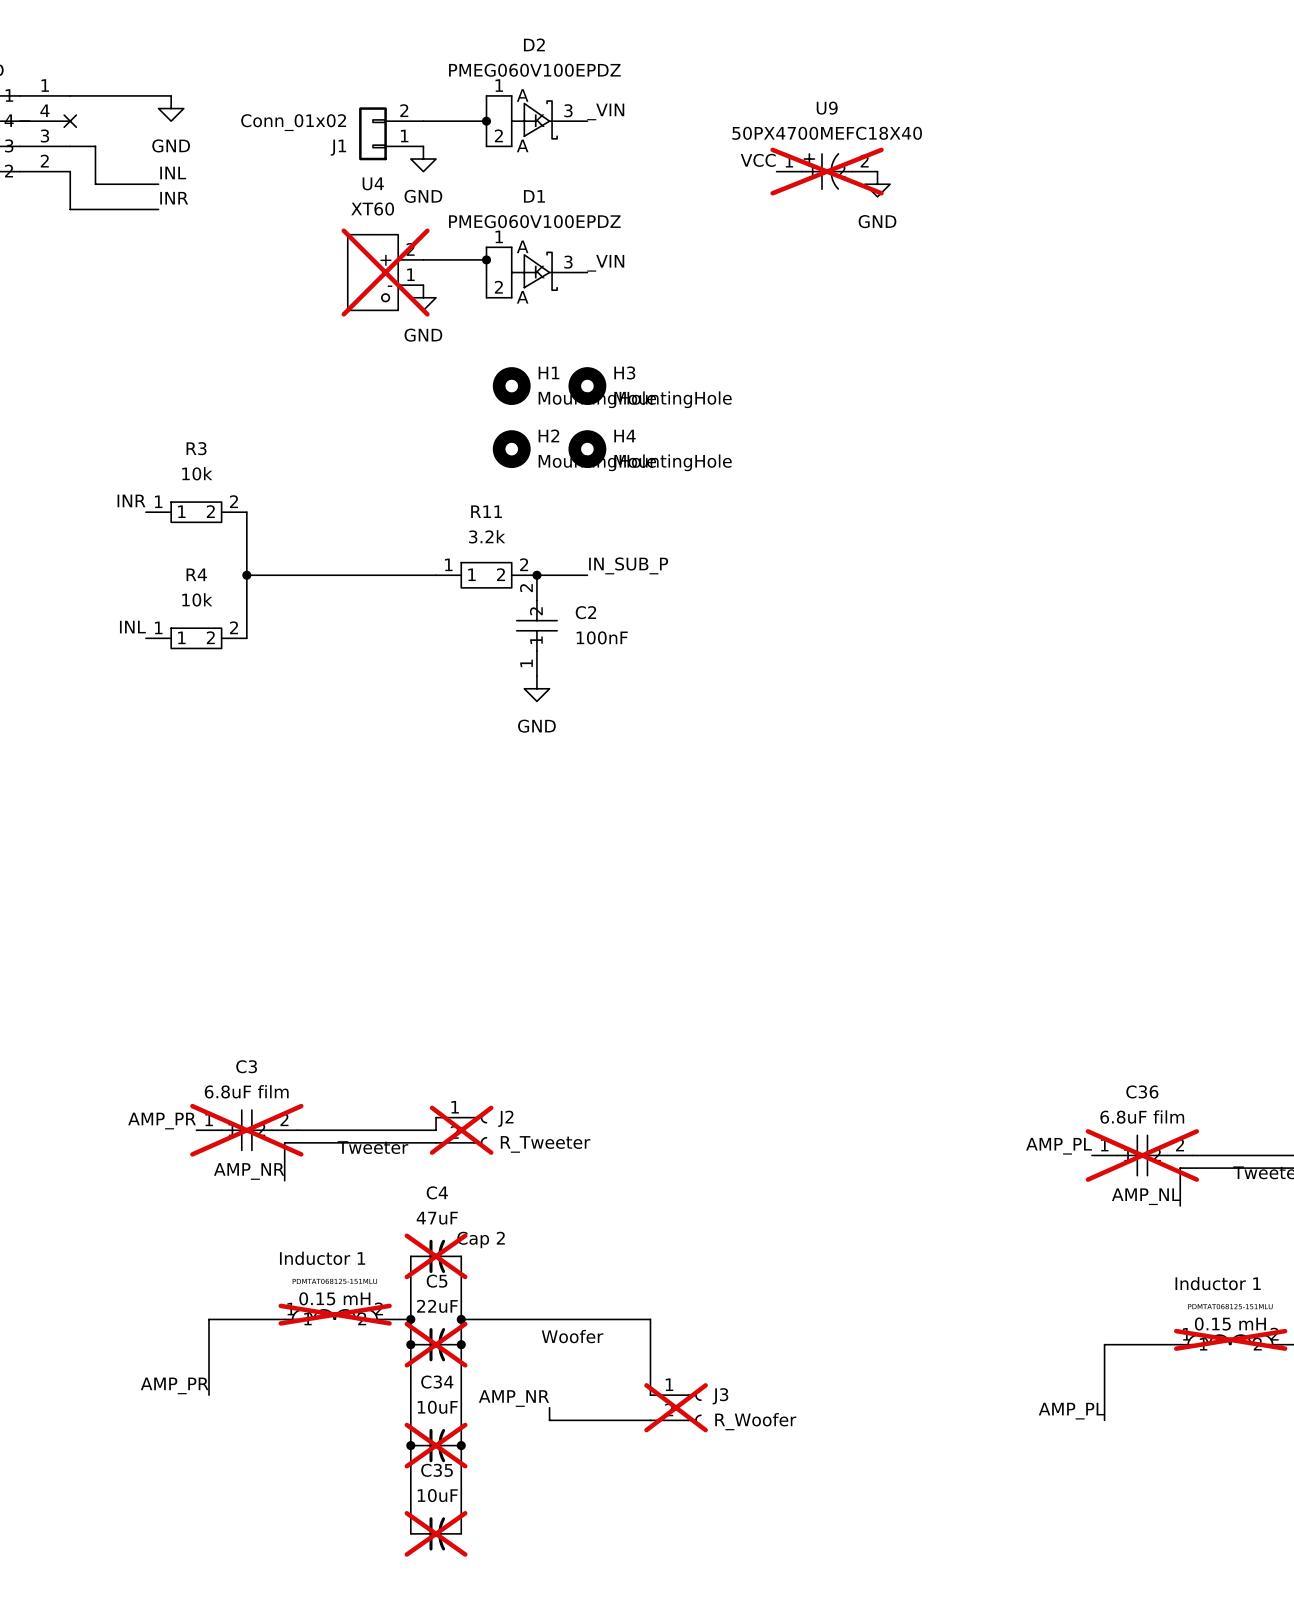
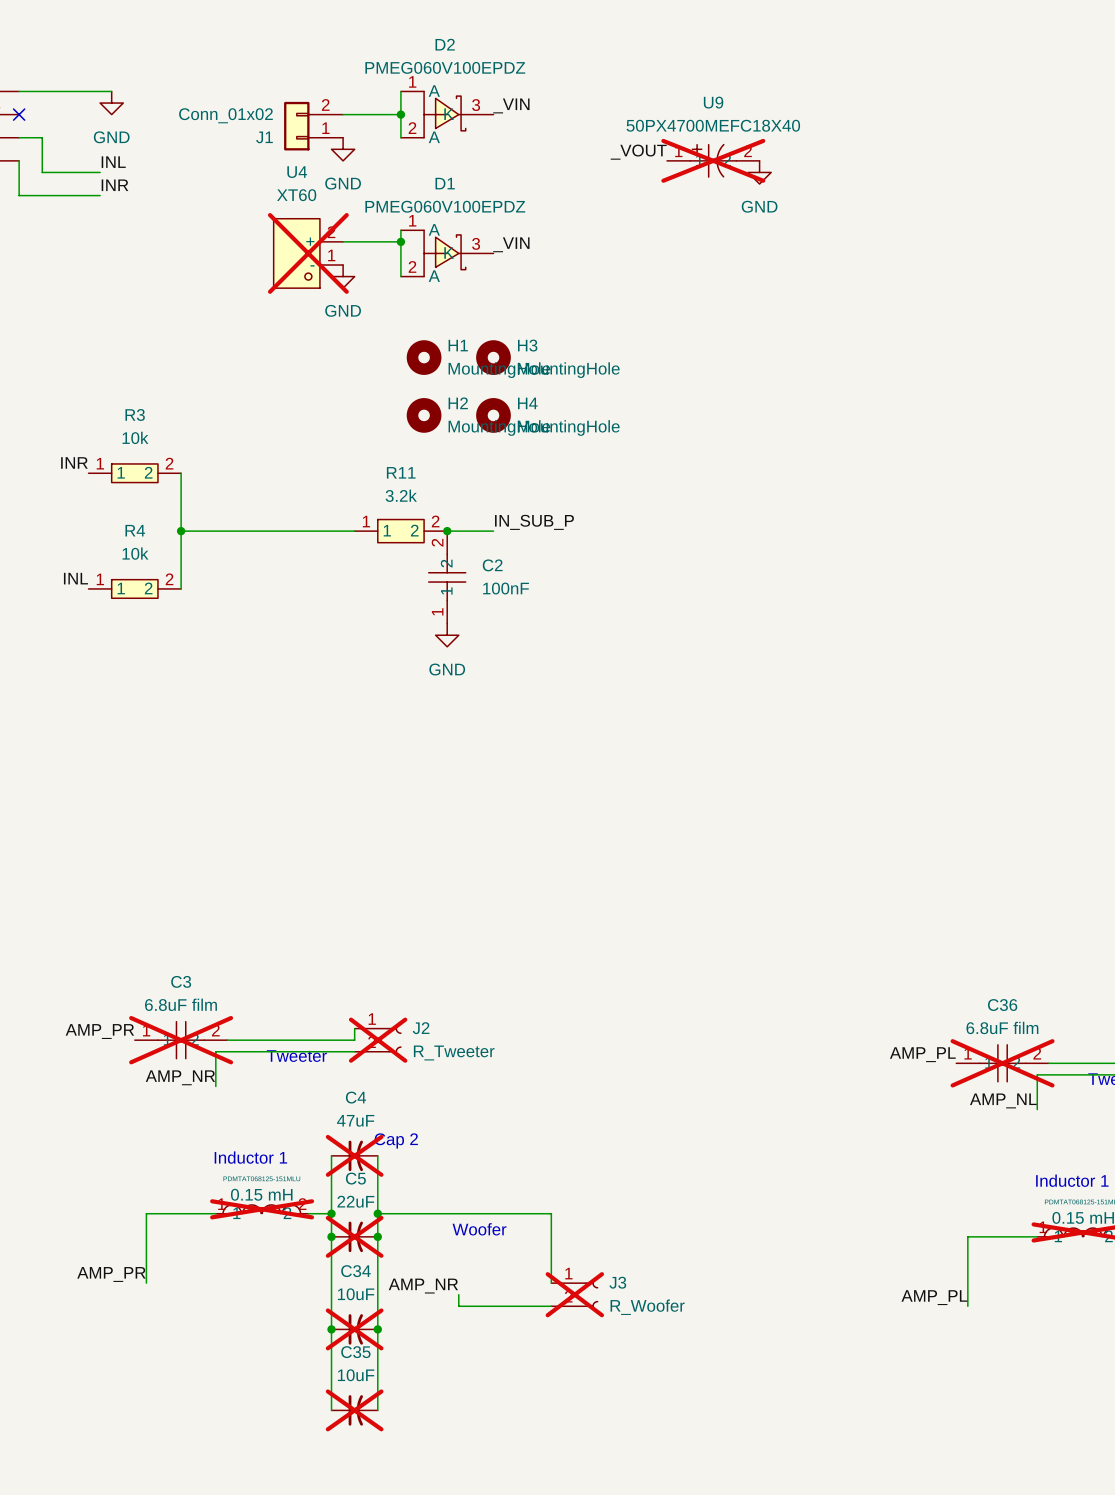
label: VCC (758, 160) -> _VOUT (638, 152)

